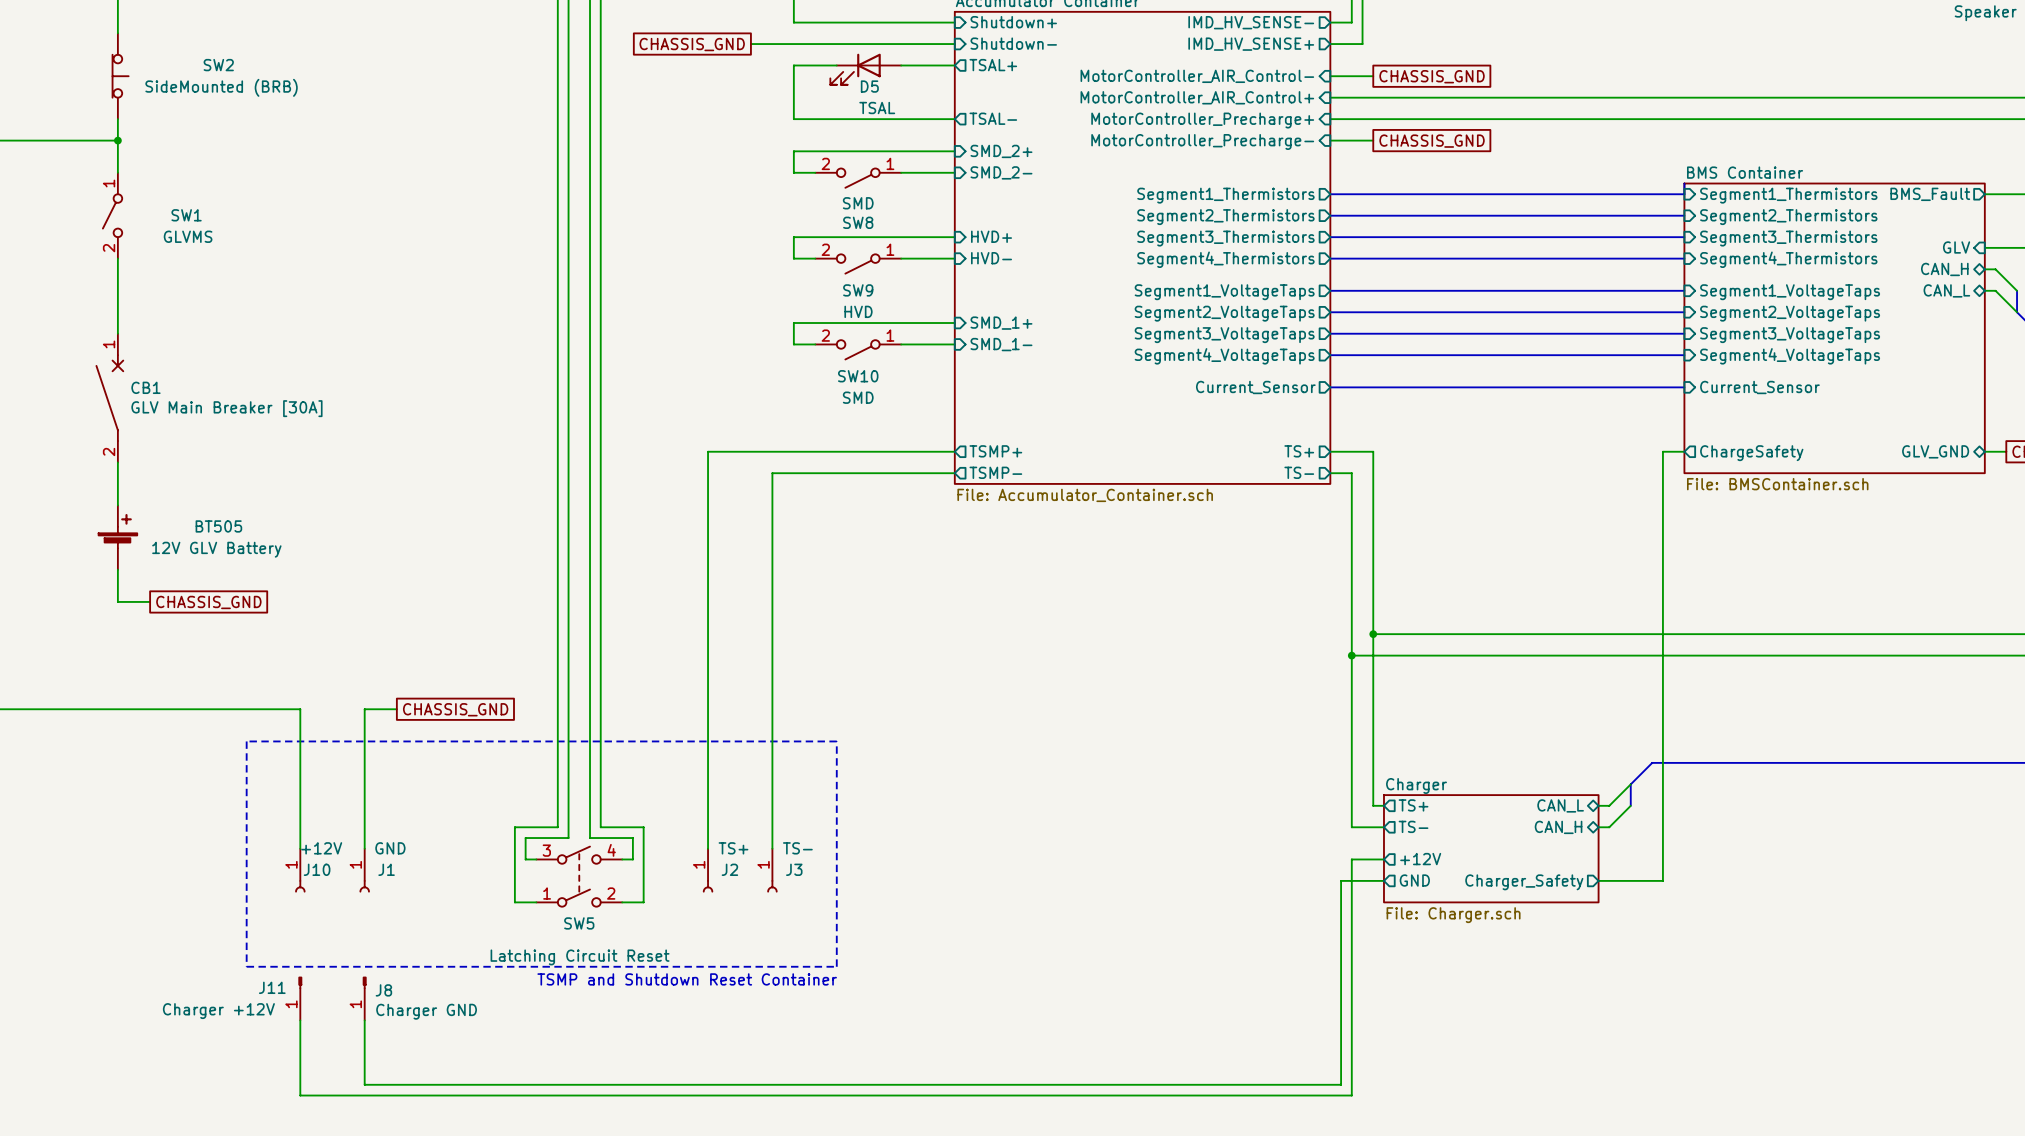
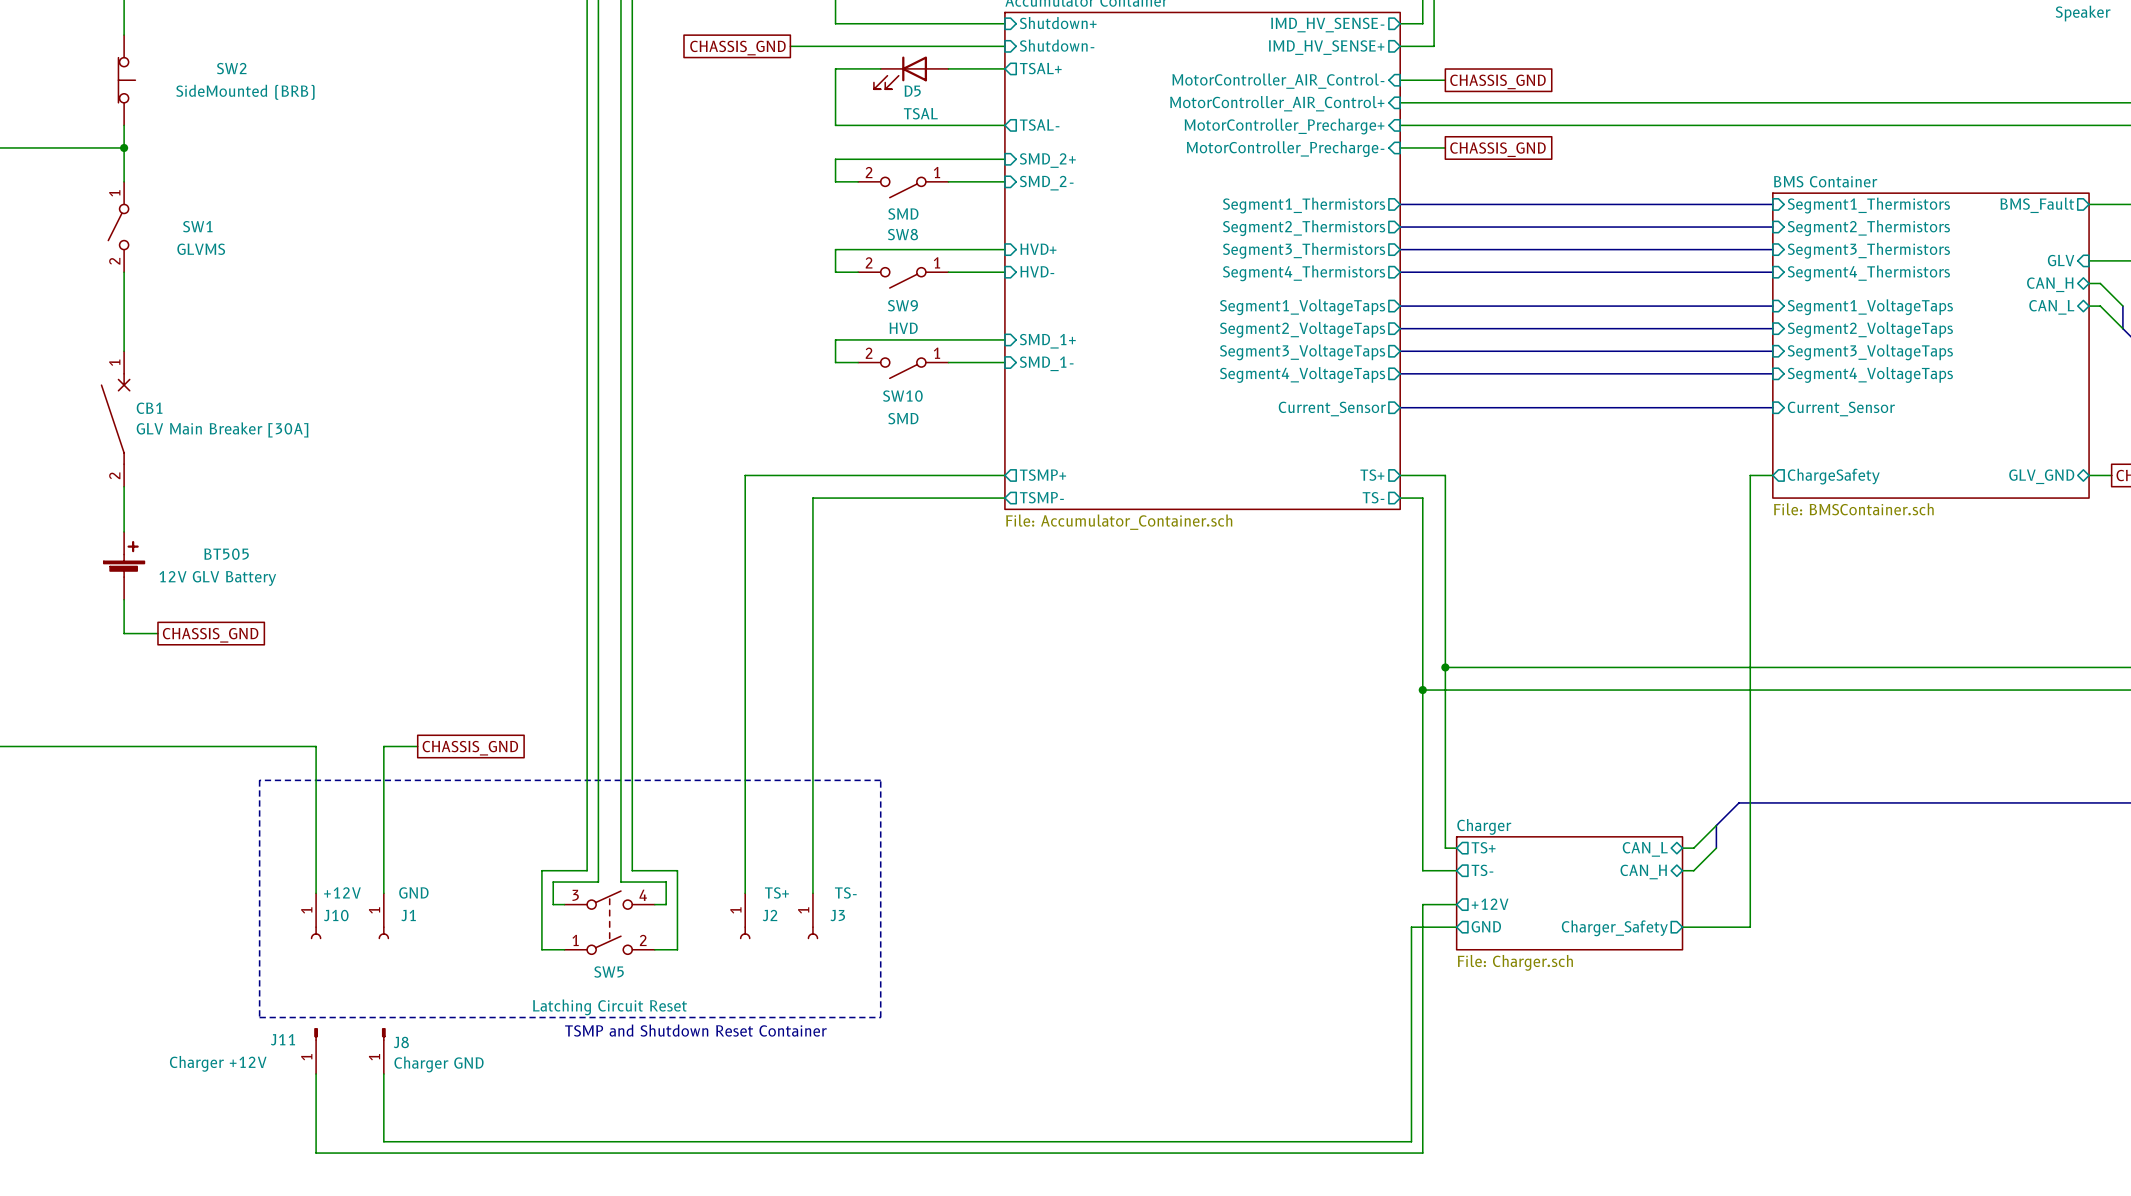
bus: (1684, 183) (1684, 194) -> none

